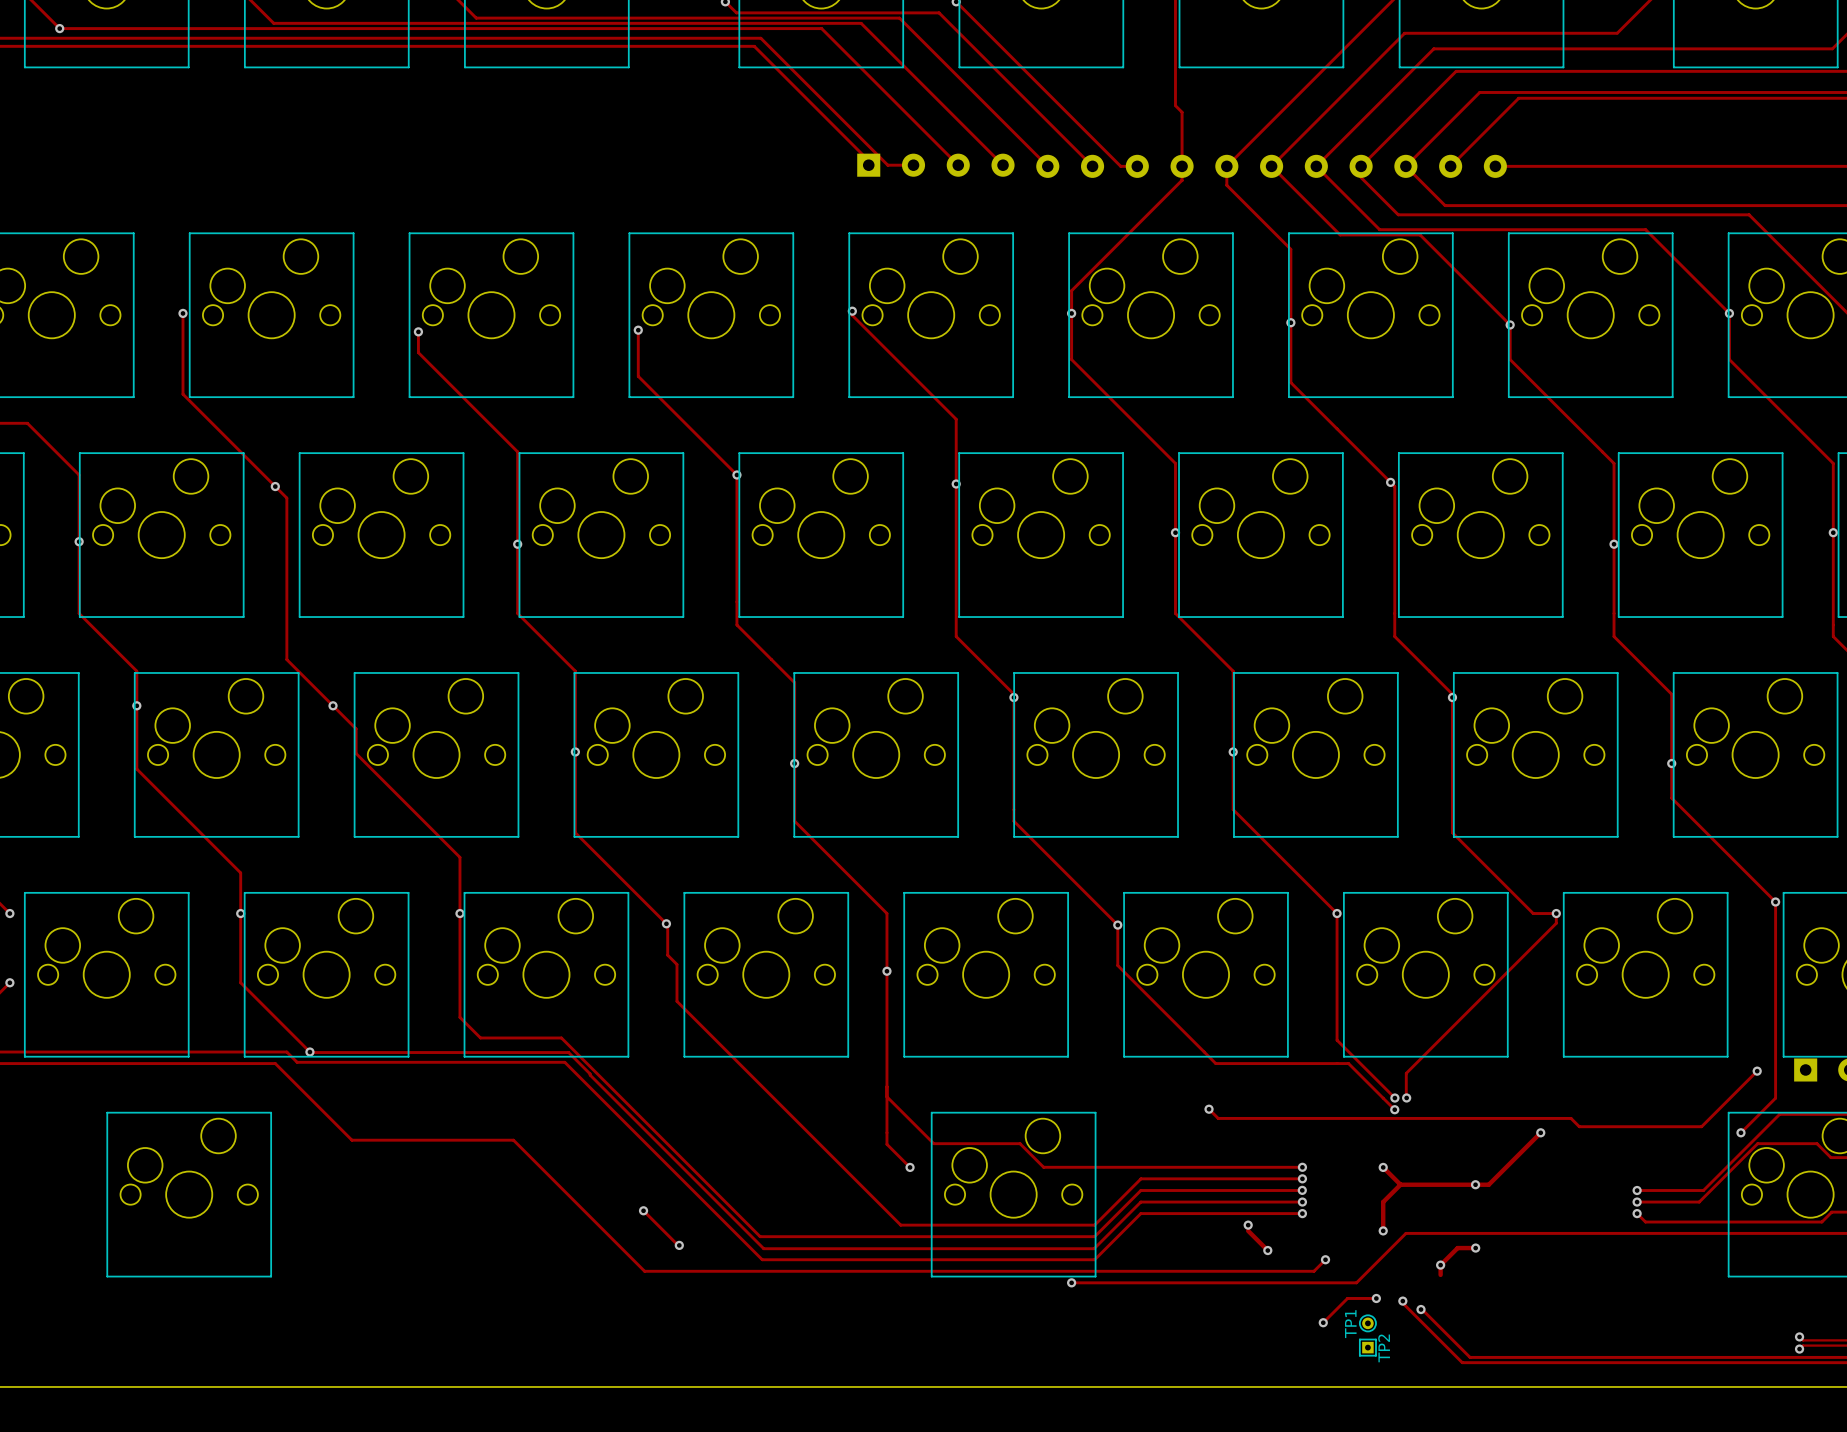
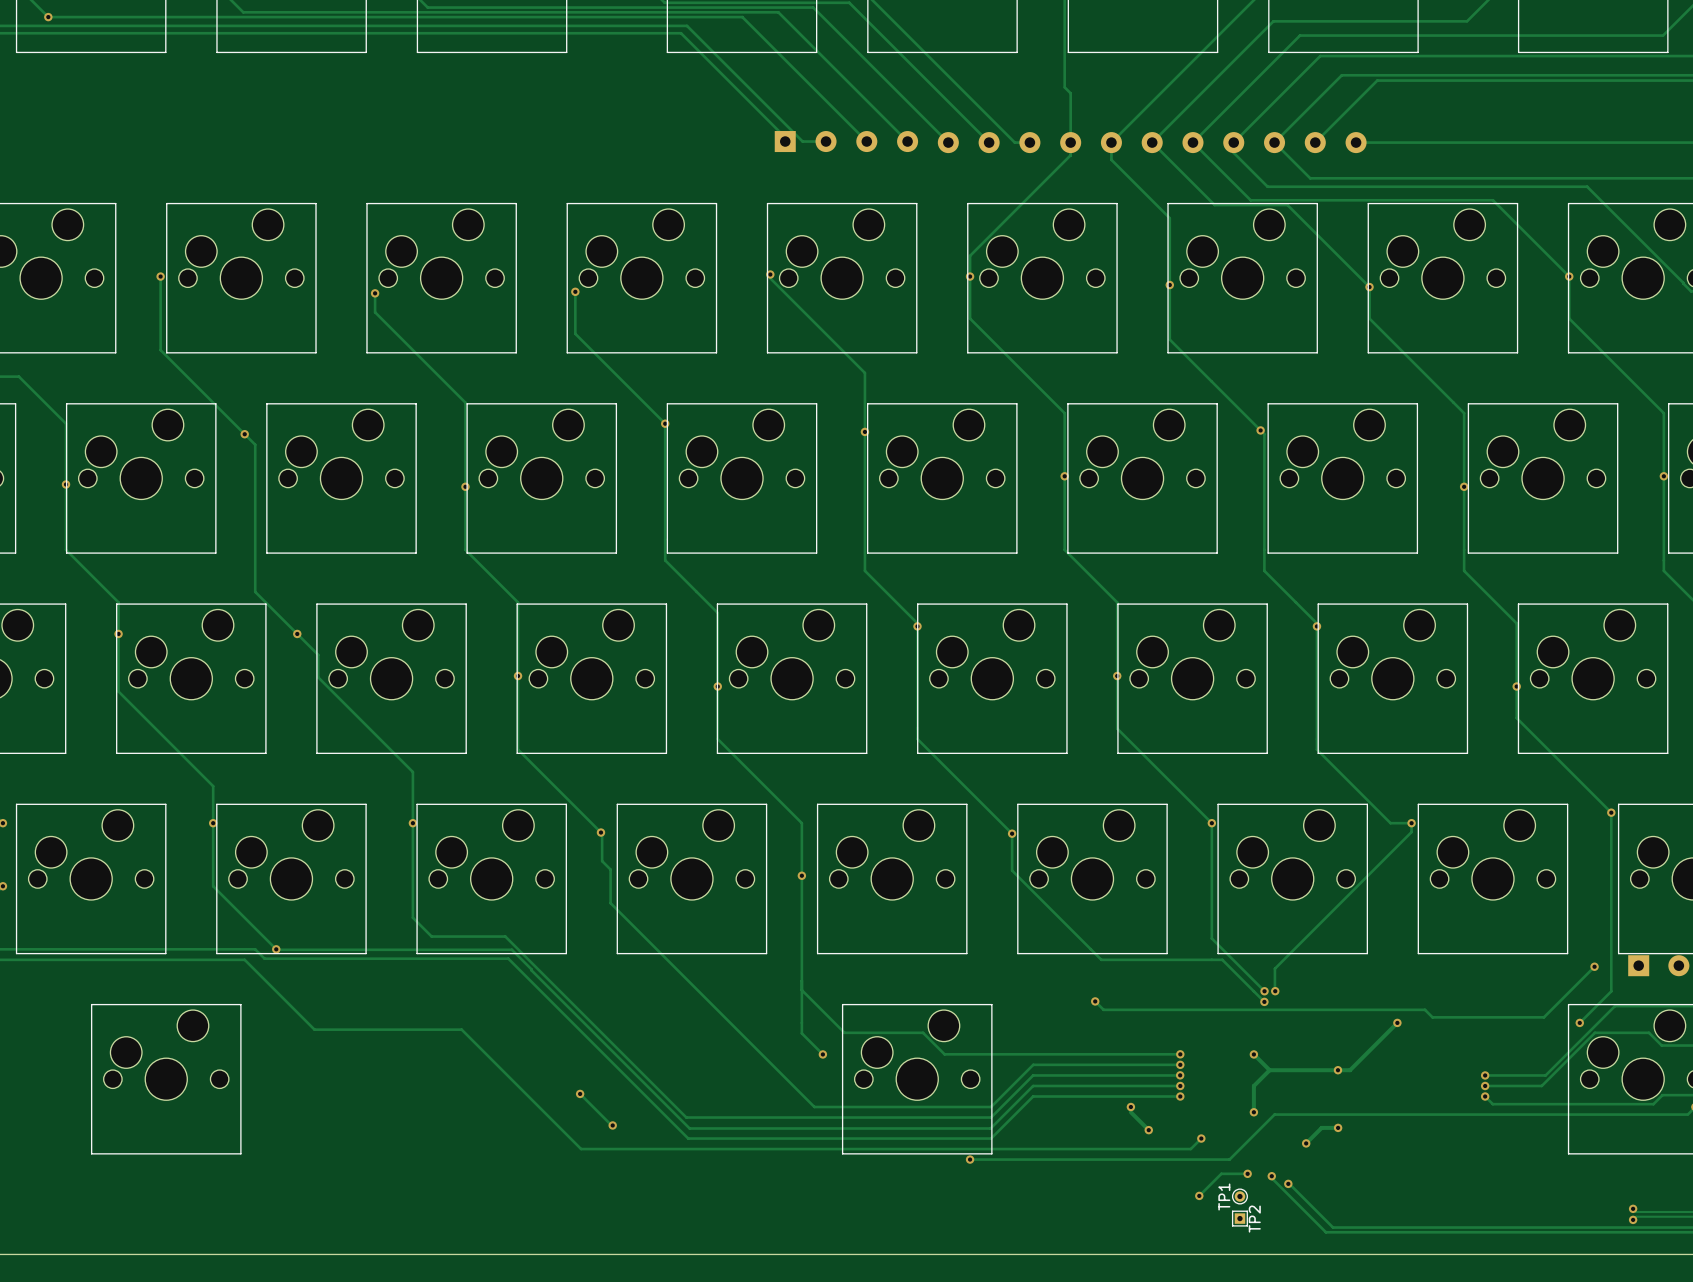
track: (1440, 1265) (1440, 1274) -> none

